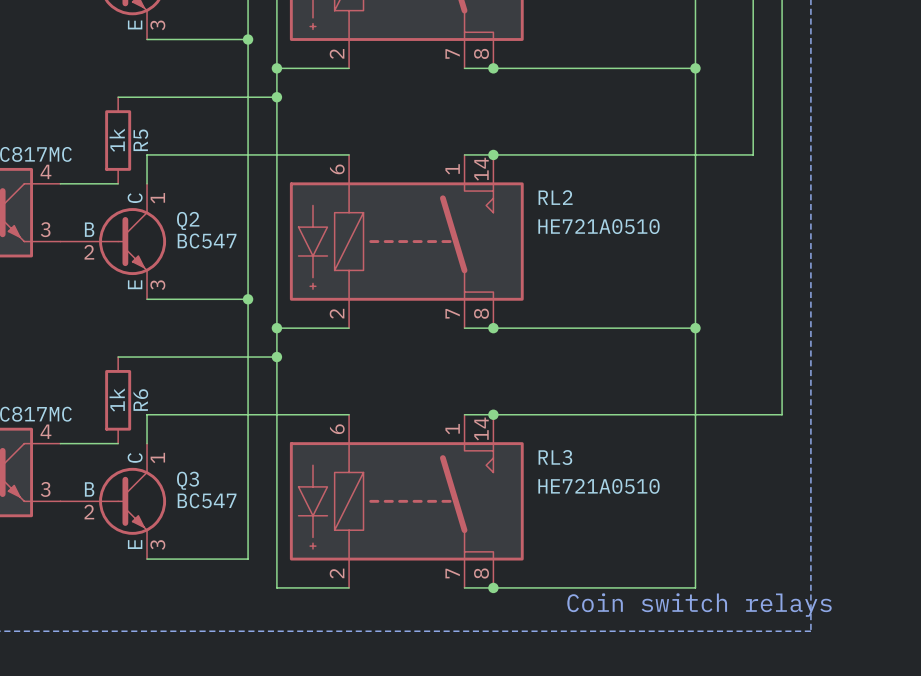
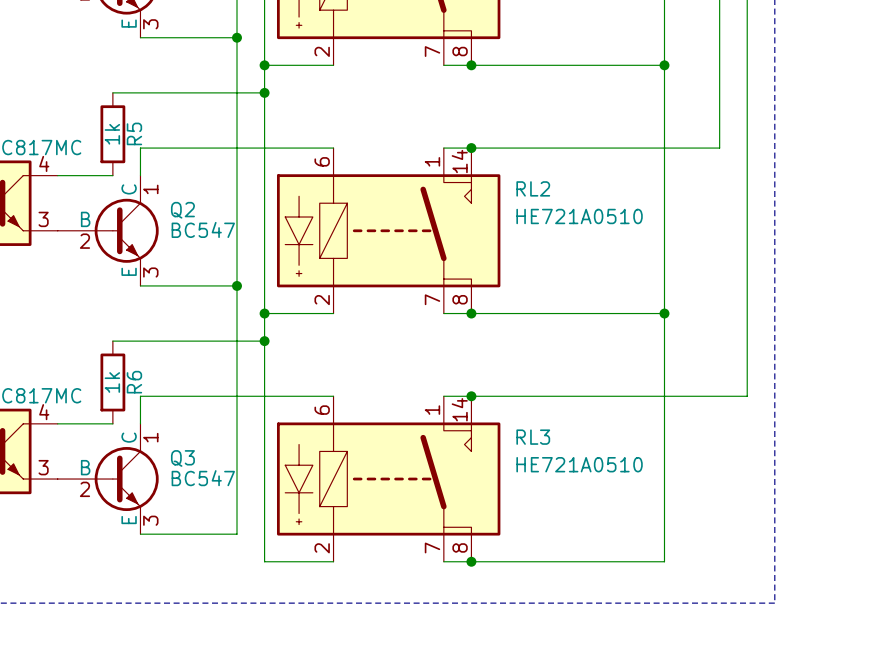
text: Coin switch relays (699, 605) -> none

